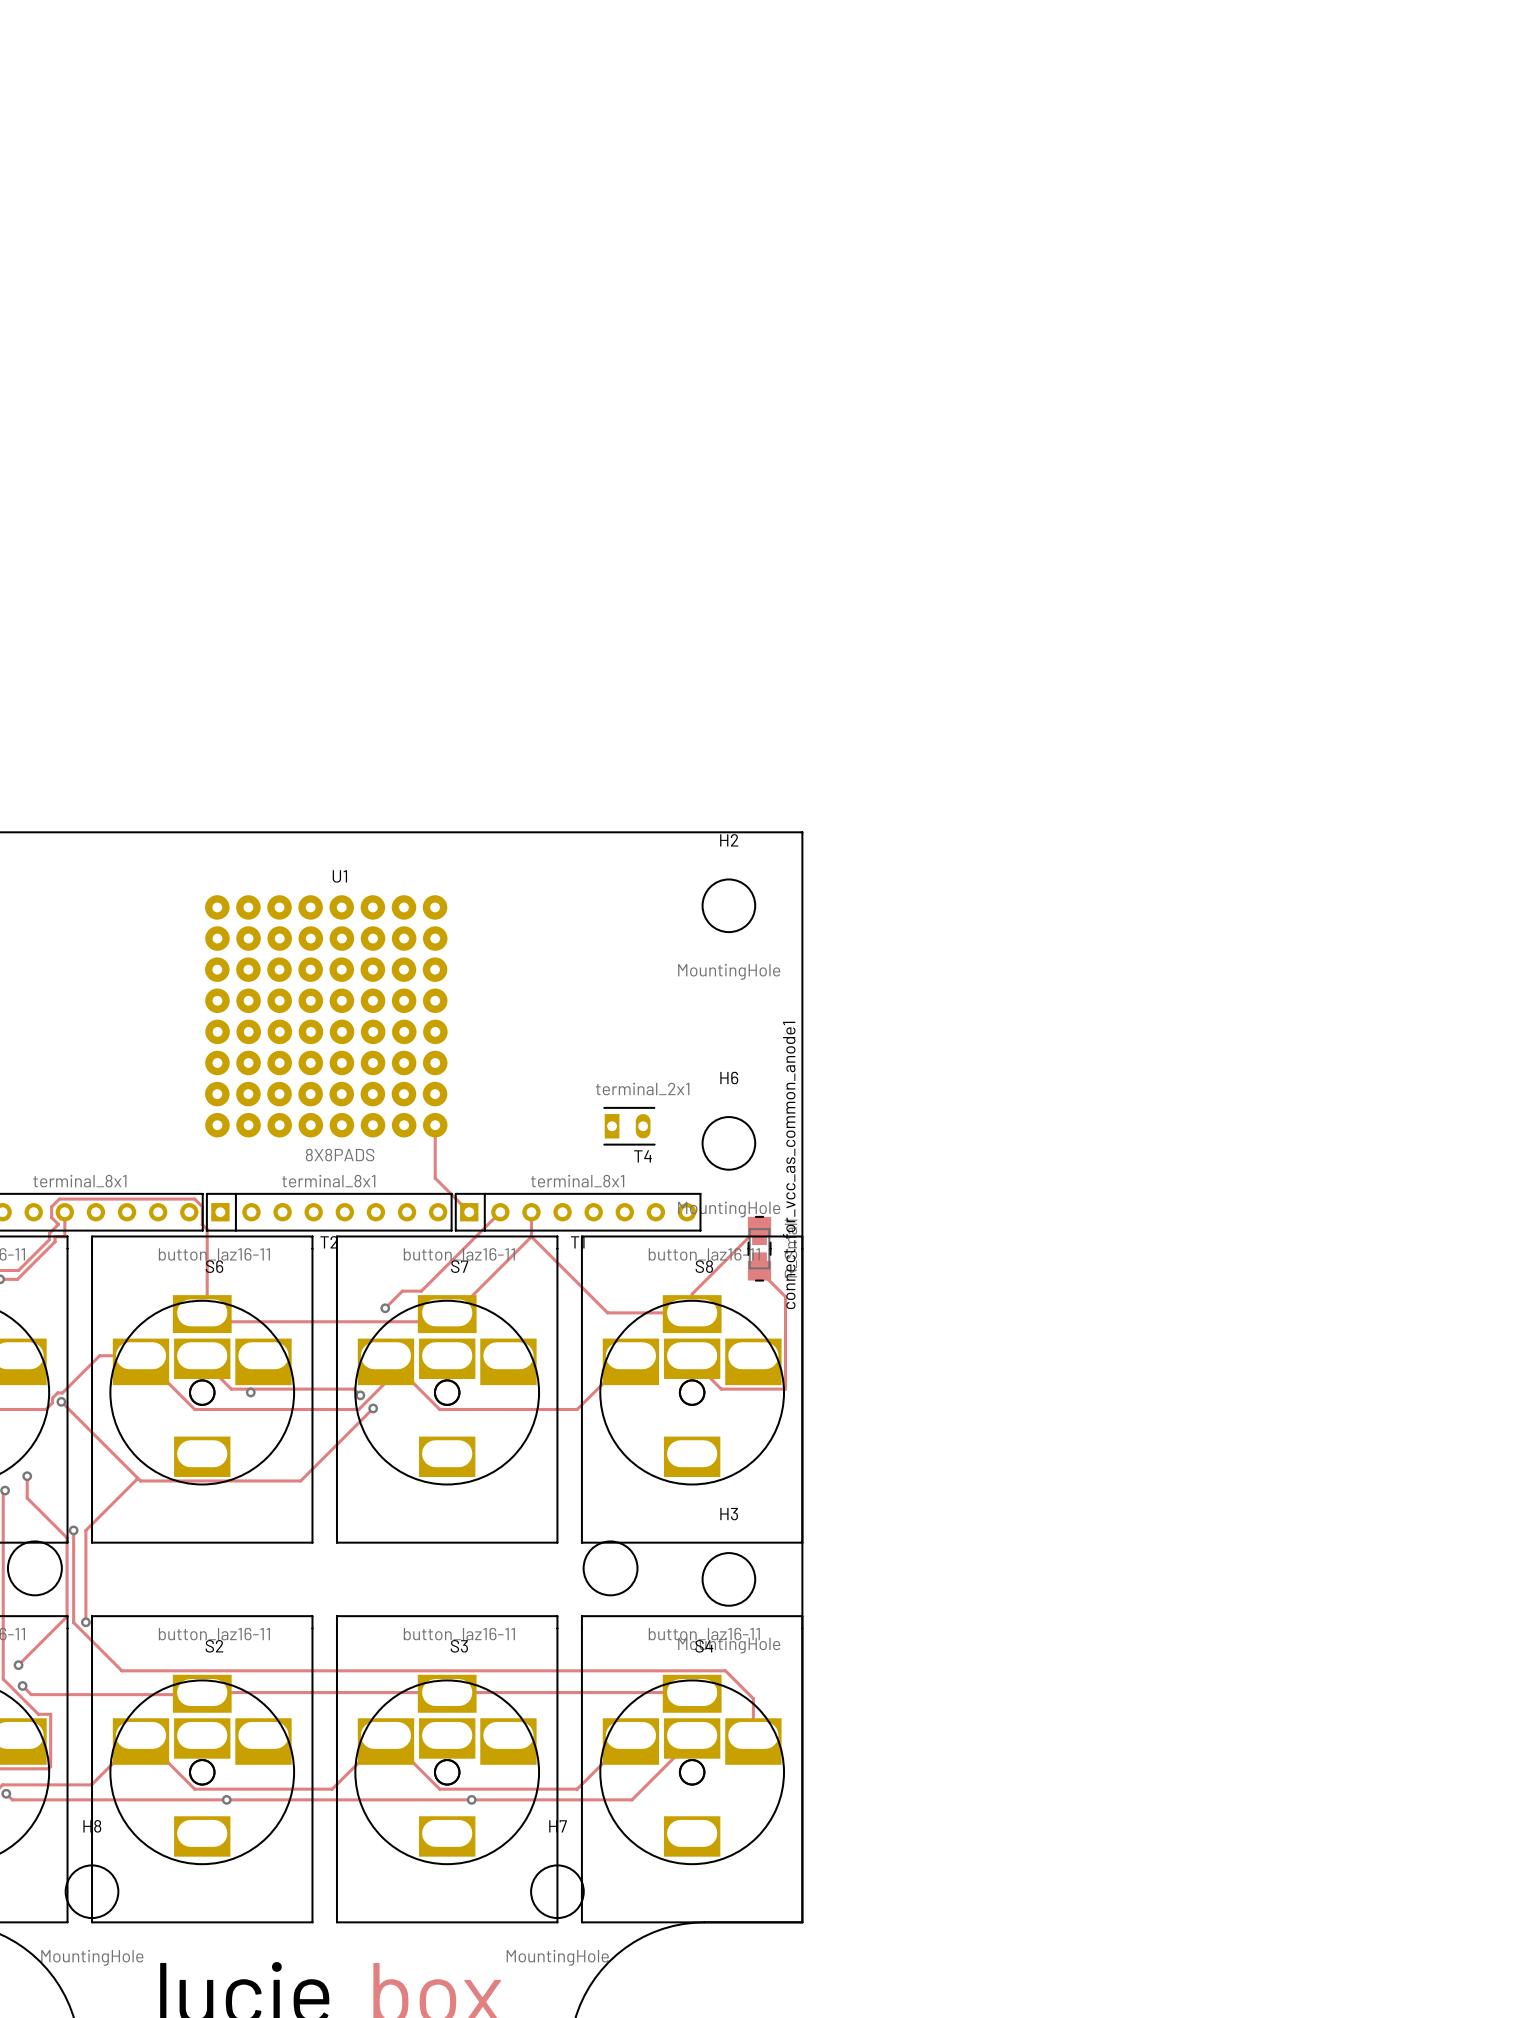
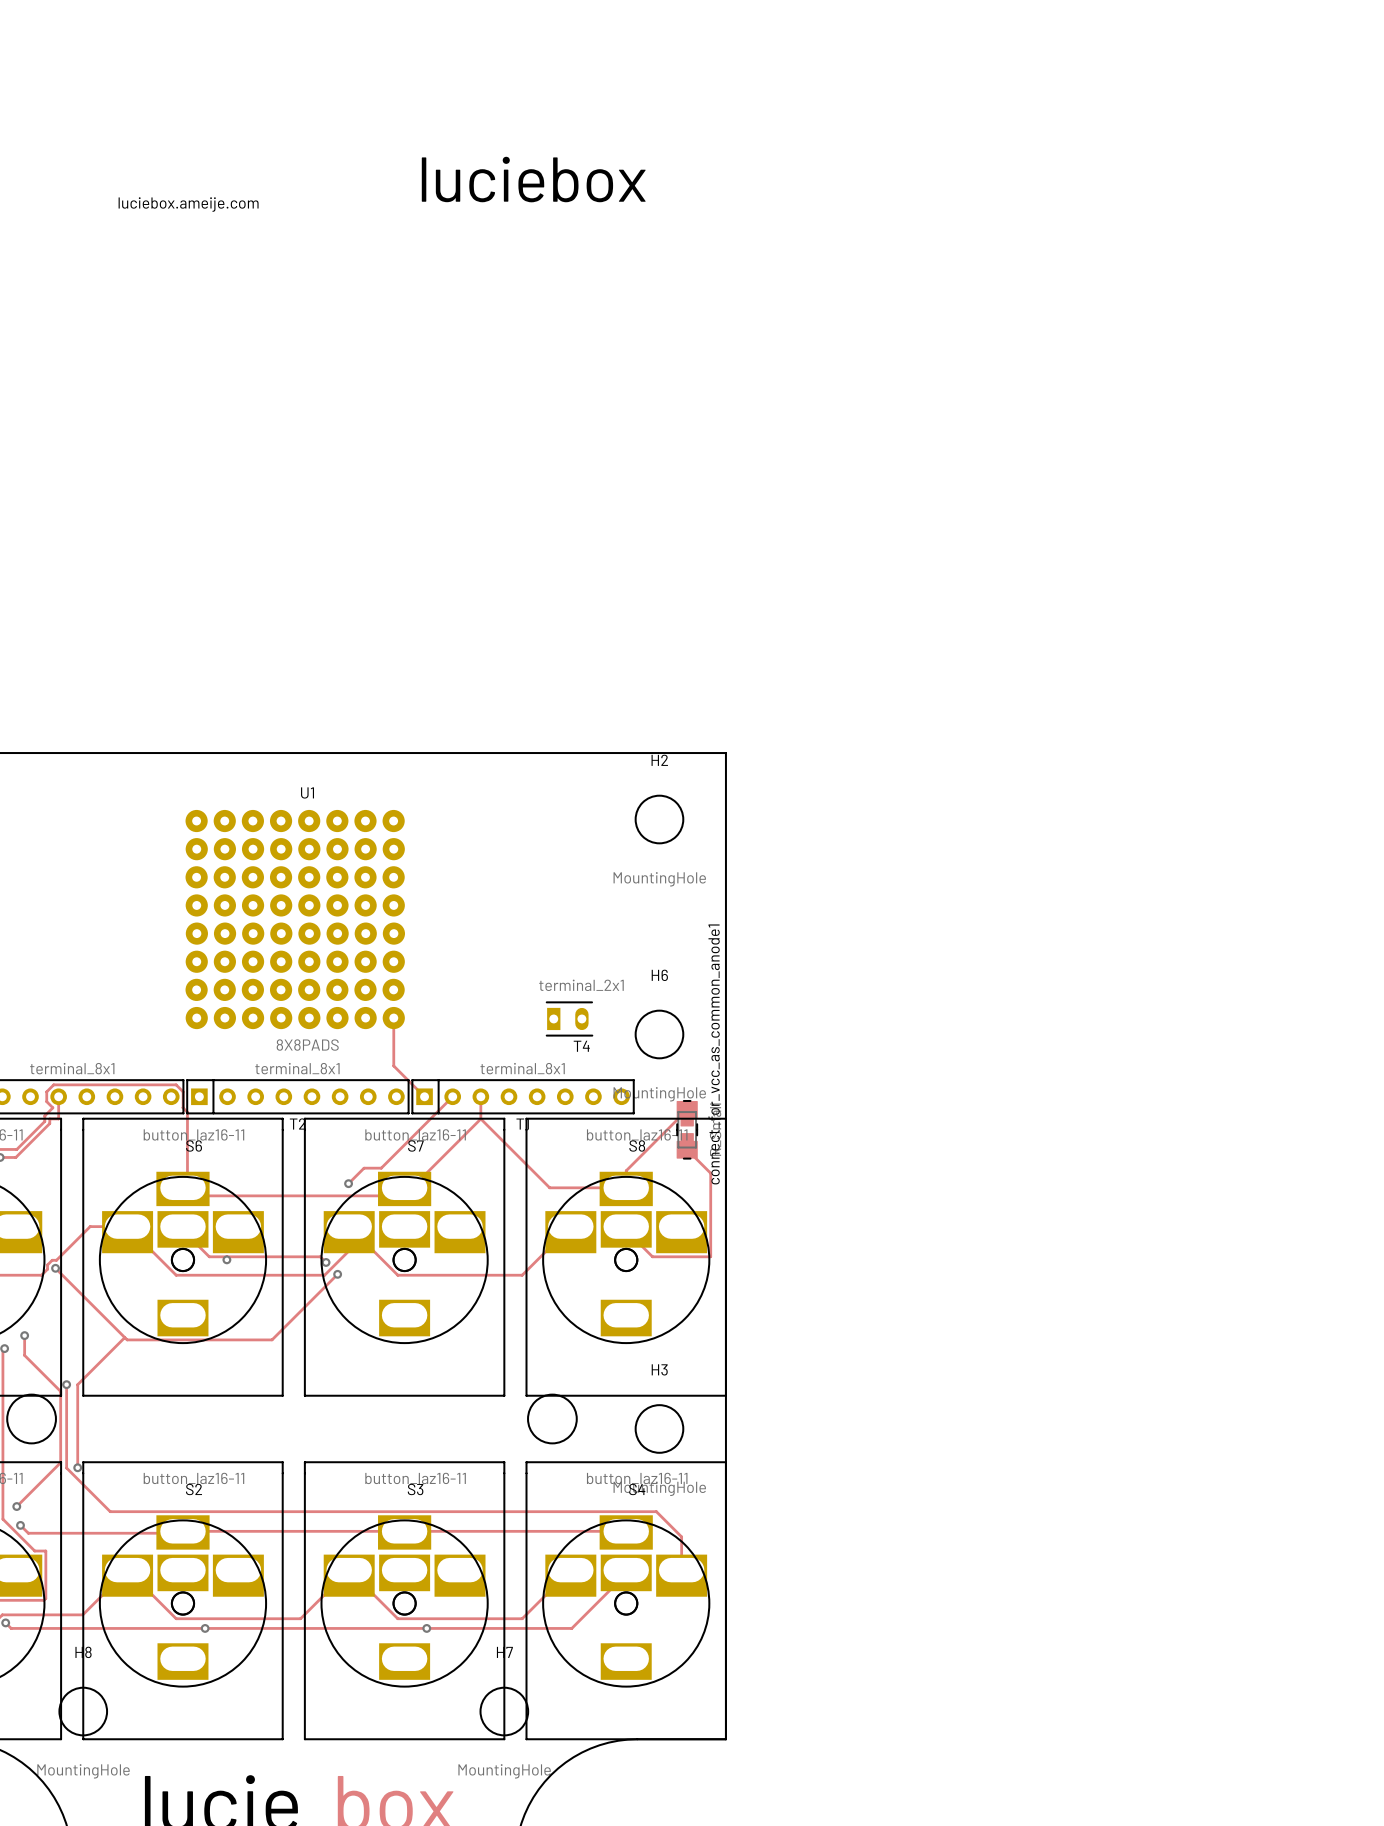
text: none -> luciebox (533, 179)
text: none -> luciebox.ameije.com (188, 204)

